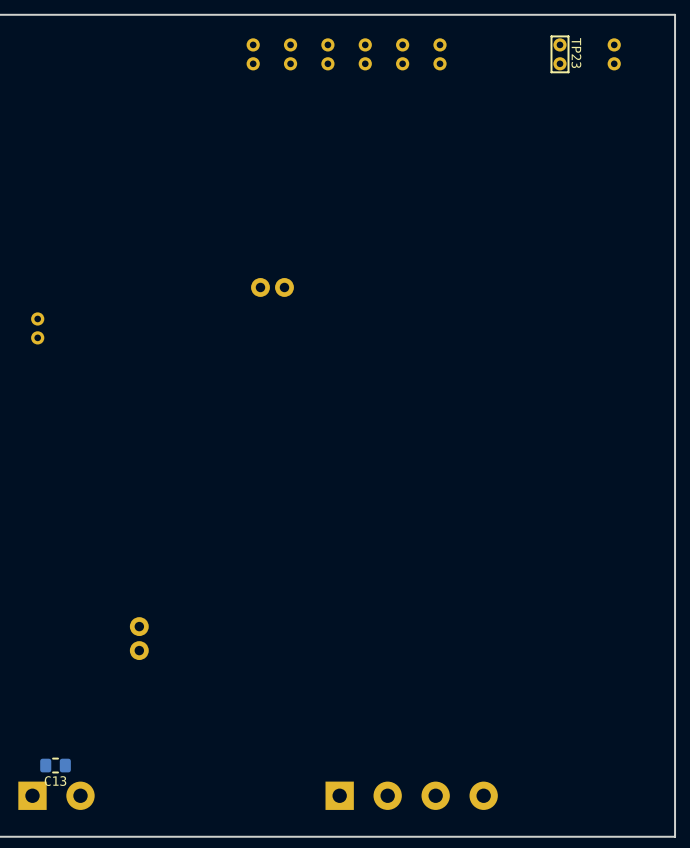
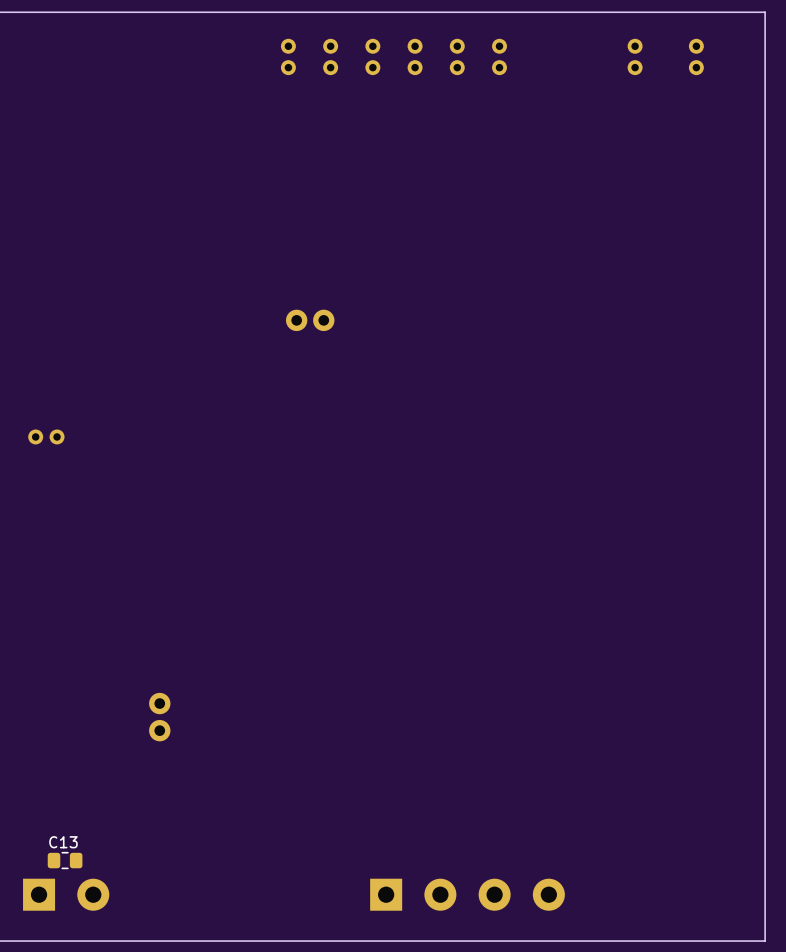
TP23 side: bottom (559, 54) -> top (635, 56)
part: (37, 328) -> none
part: none -> (46, 436)
C13 name position: C13 (55, 781) -> C13 (63, 842)

